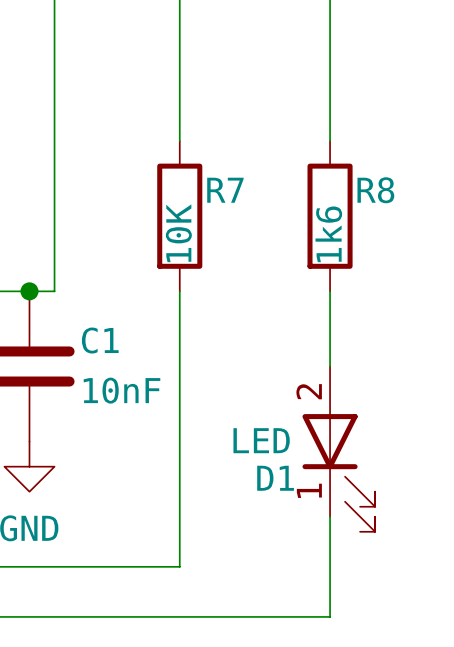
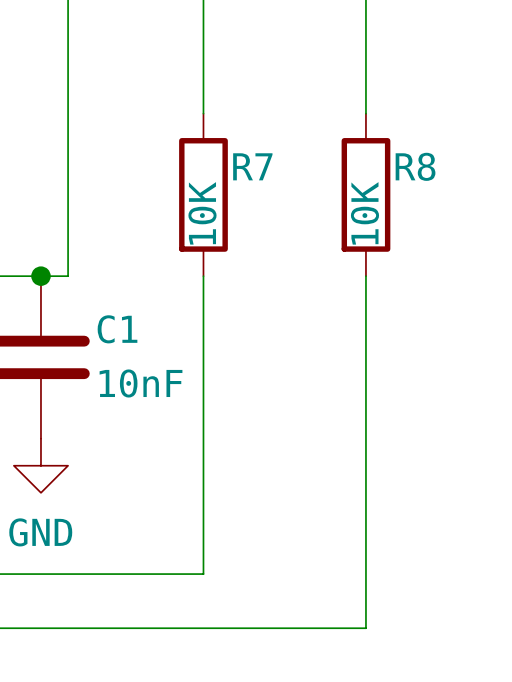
R8 value: 1k6 (328, 234) -> 10K (364, 213)
D1: LED (338, 449) -> none

